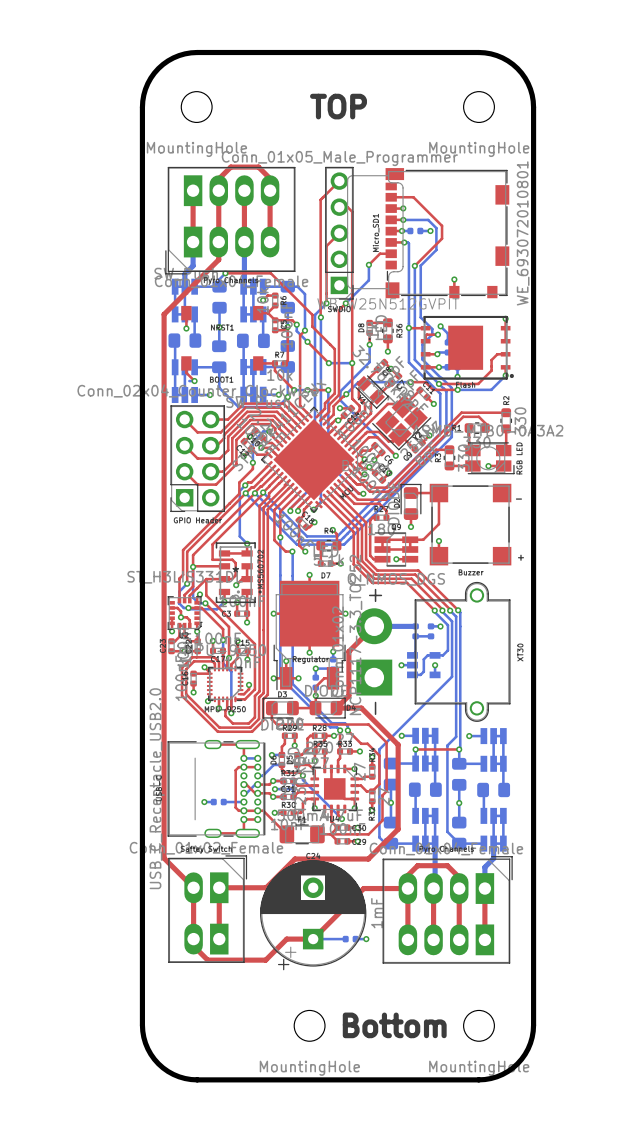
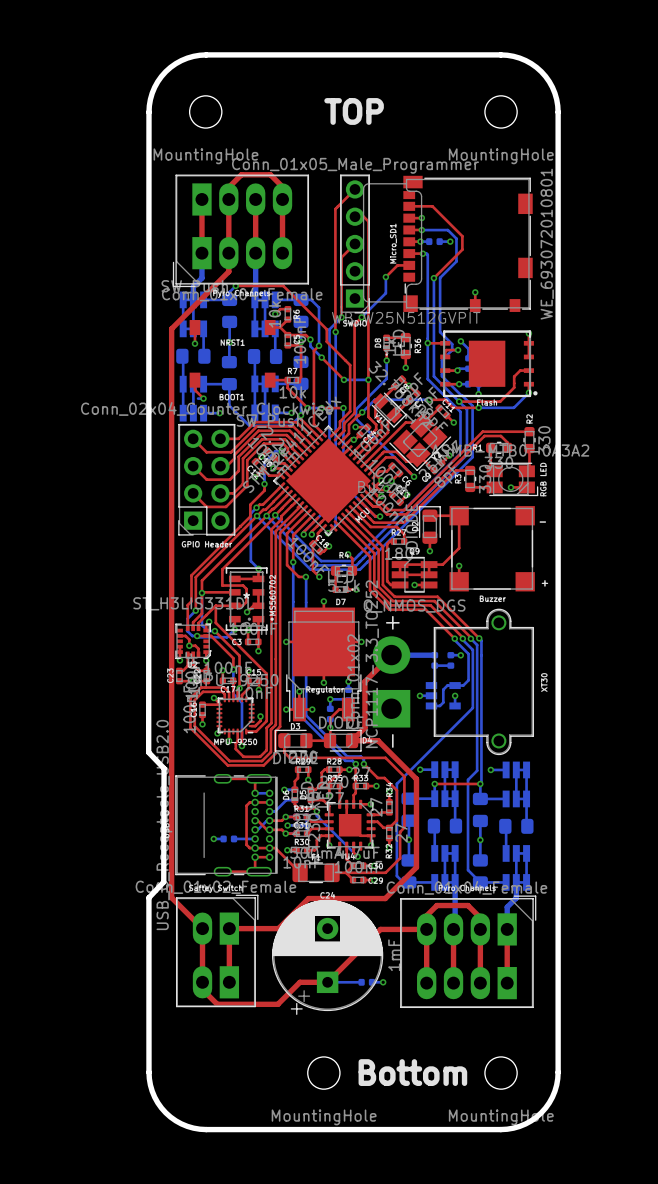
board edge: (142, 107) (142, 1025) -> (148, 112) (148, 752) (164, 768) (163, 882) (148, 897) (148, 1072)

